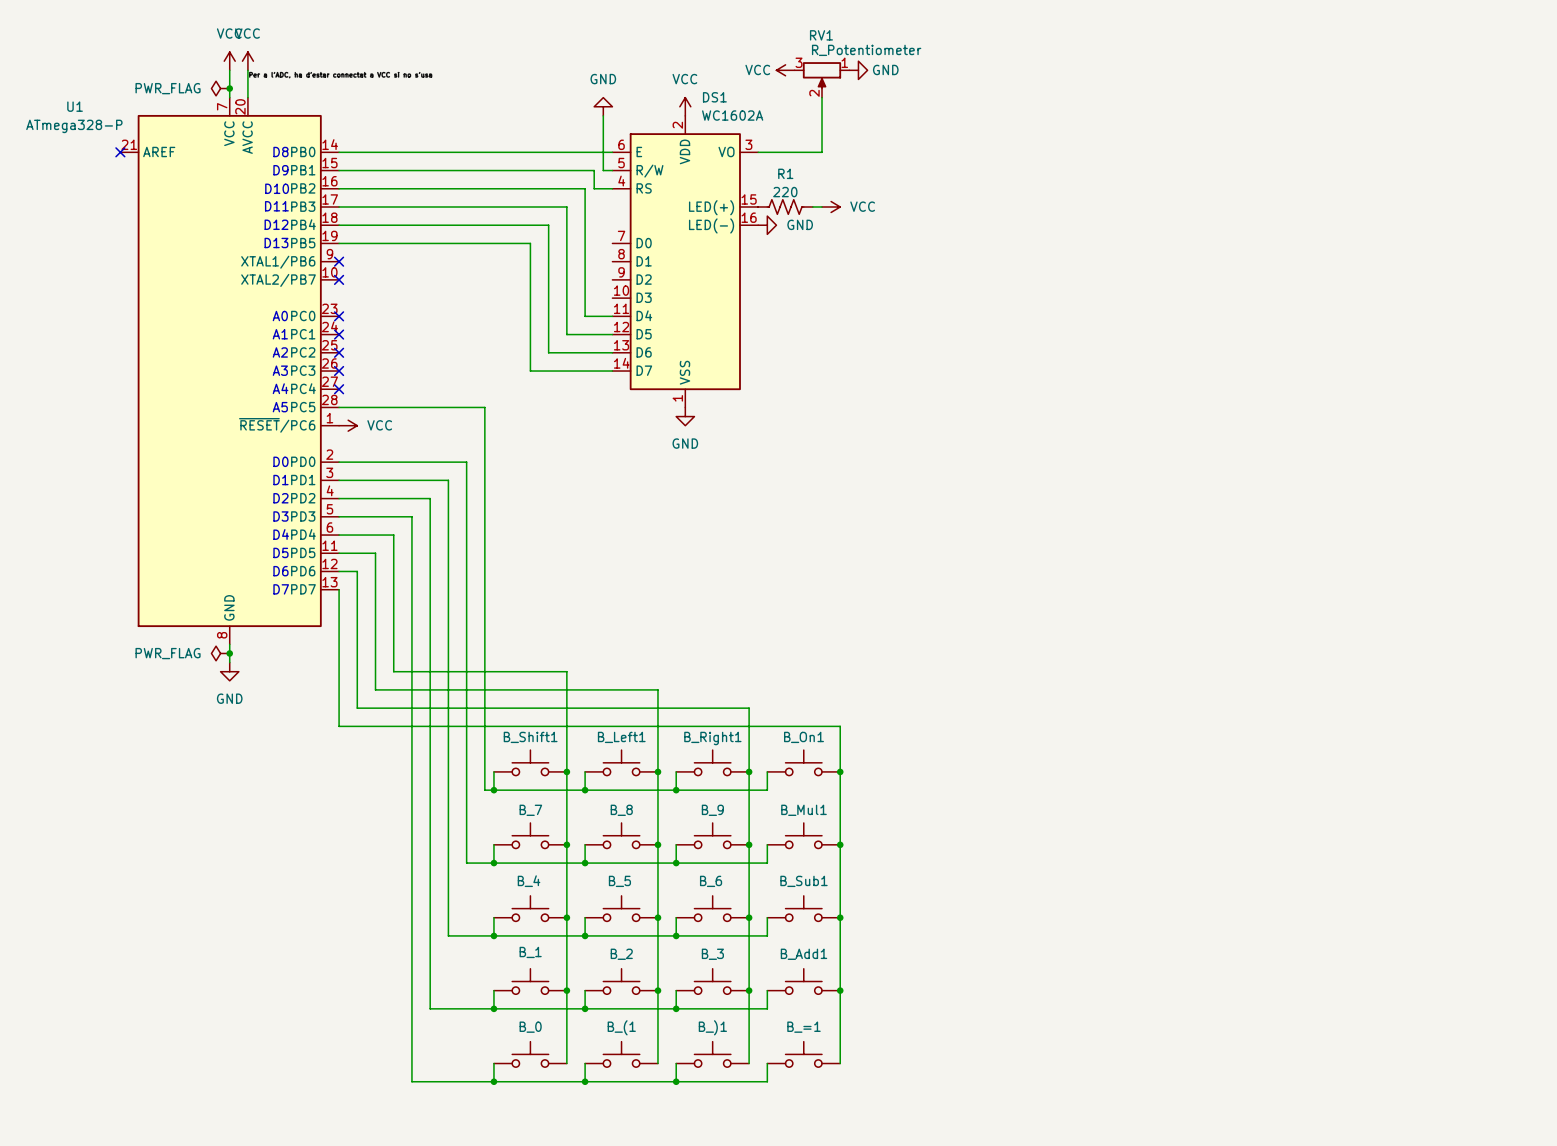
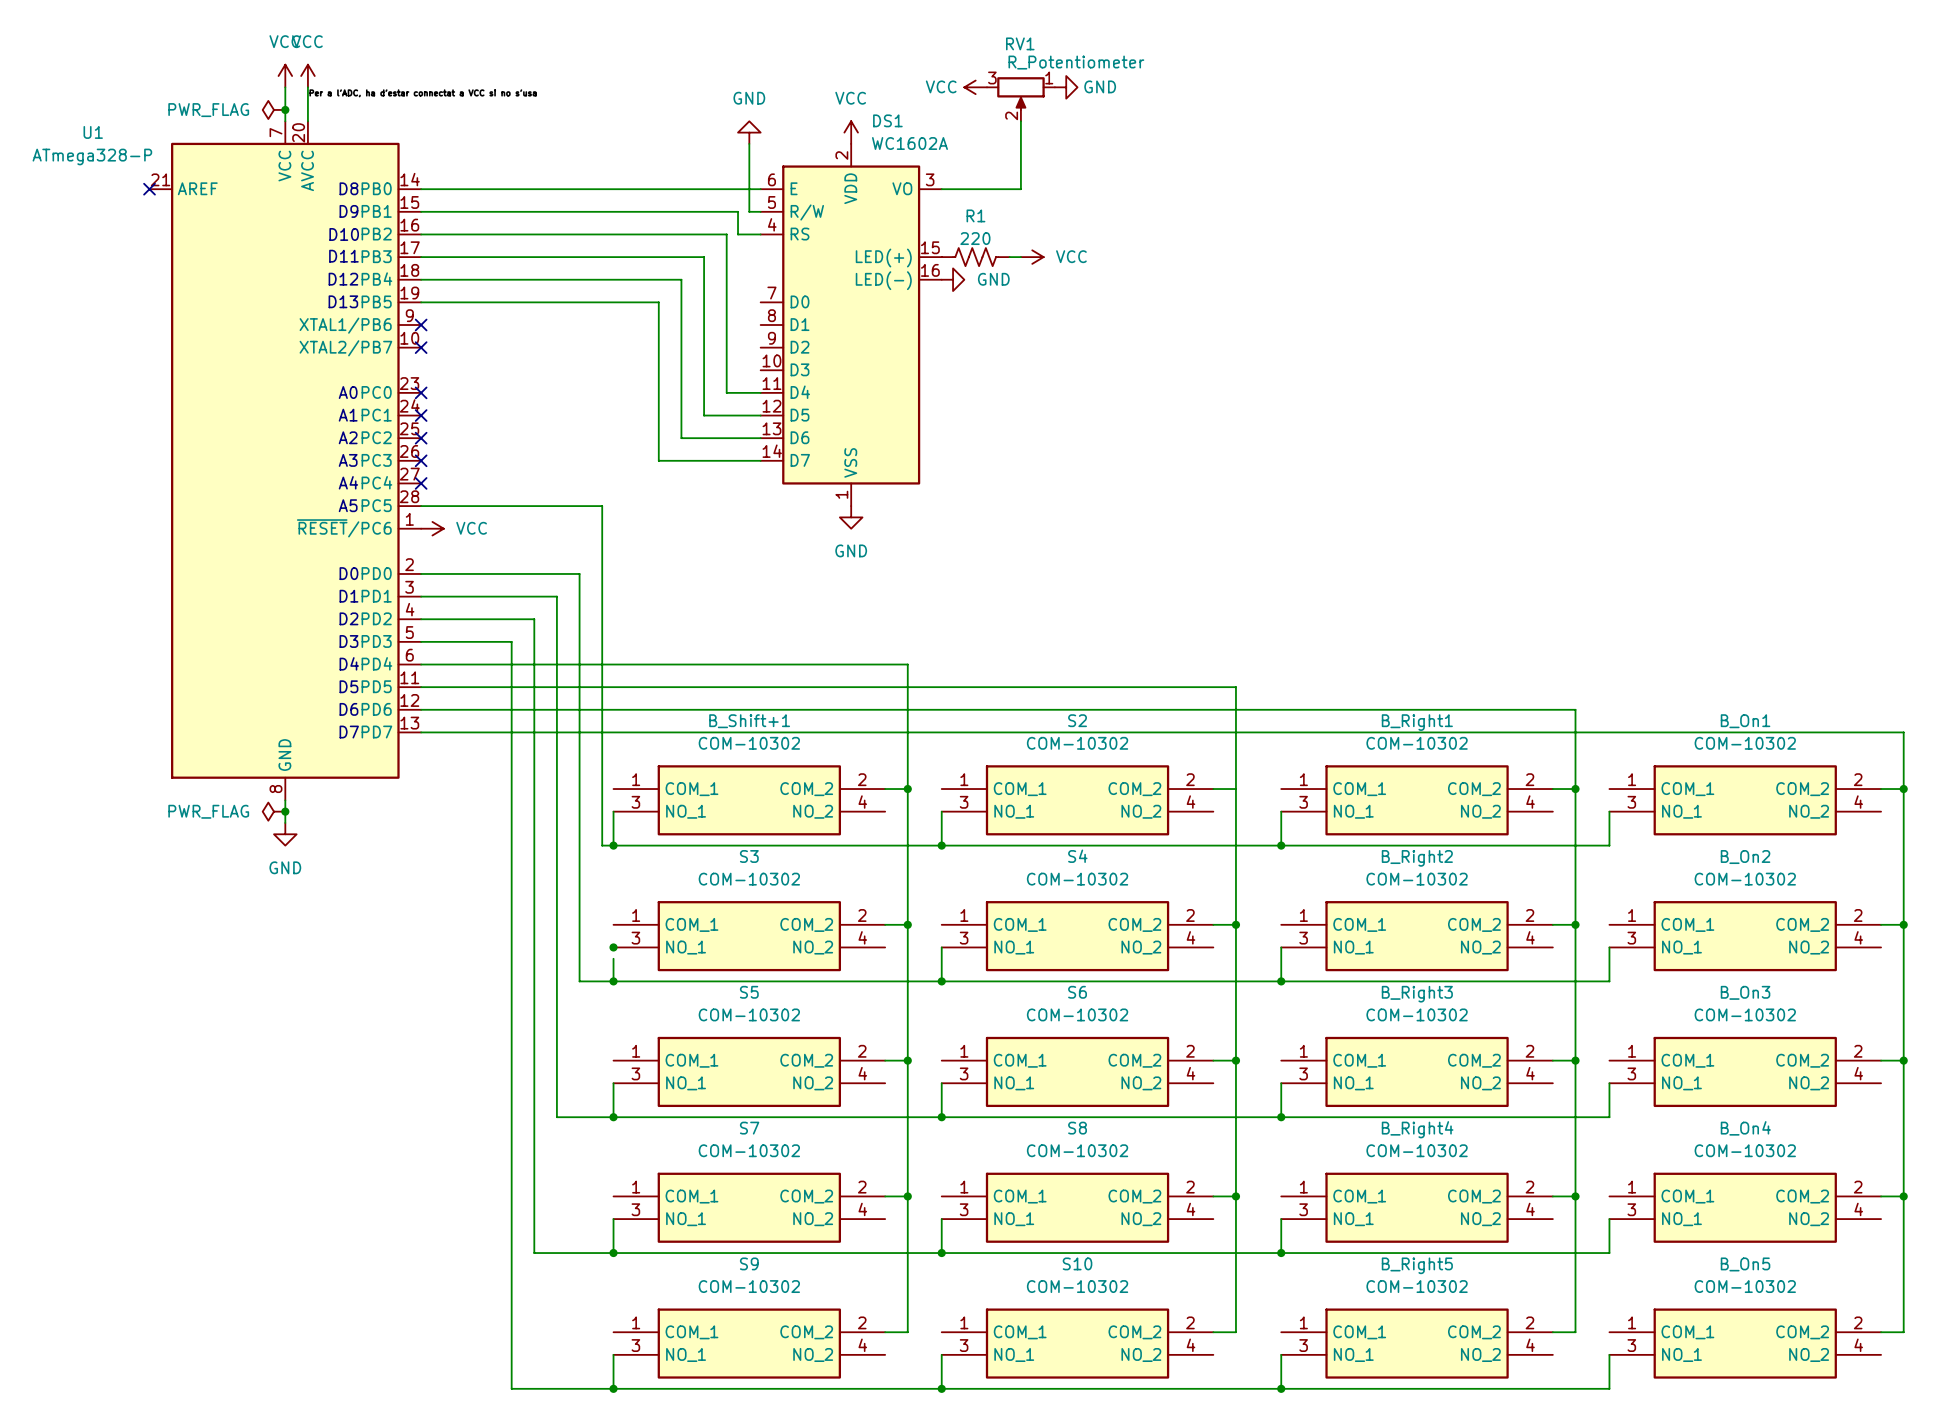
wire: (393, 535) (393, 671) (566, 671) (566, 1063) -> (489, 664) (907, 664) (907, 1332) (885, 1332)
wire: (375, 553) (375, 689) (657, 689) (657, 1063) -> (466, 687) (1235, 687) (1235, 1332) (1213, 1332)
wire: (357, 571) (357, 708) (749, 708) (749, 1063) -> (443, 709) (1575, 709) (1575, 1332) (1552, 1332)
wire: (339, 589) (339, 726) (840, 726) (840, 1063) -> (421, 732) (1903, 732) (1903, 1332) (1881, 1332)
B_Right1 value: none -> COM-10302 (1417, 743)
B_On1 value: none -> COM-10302 (1745, 743)
wire: none -> (885, 789) (907, 789)
junction: none -> (907, 789)
wire: none -> (1213, 789) (1235, 789)
wire: none -> (1552, 789) (1575, 789)
junction: none -> (1575, 789)
wire: none -> (1881, 789) (1903, 789)
junction: none -> (1903, 789)
B_Shift+1: none -> COM-10302 (749, 800)
S2: none -> COM-10302 (1077, 800)
wire: none -> (613, 811) (613, 845)
wire: none -> (941, 811) (941, 845)
wire: none -> (1281, 811) (1281, 845)
wire: none -> (1609, 811) (1609, 845) (602, 845)
wire: (484, 680) (484, 790) -> (579, 981) (602, 981)
junction: none -> (613, 845)
junction: none -> (941, 845)
junction: none -> (1281, 845)
B_On1 name position: B_On1 (803, 737) -> B_On1 (1745, 721)
B_Right1 name position: B_Right1 (712, 738) -> B_Right1 (1417, 722)
wire: none -> (885, 924) (907, 924)
junction: none -> (907, 924)
wire: none -> (1213, 924) (1235, 924)
junction: none -> (1235, 924)
wire: none -> (1552, 924) (1575, 924)
junction: none -> (1575, 924)
wire: none -> (1881, 924) (1903, 924)
junction: none -> (1903, 924)
B_Right1 symbol: [676, 750, 750, 776] -> [1281, 765, 1553, 836]
B_On1 symbol: [767, 750, 841, 776] -> [1609, 765, 1882, 836]
S3: none -> COM-10302 (749, 936)
S4: none -> COM-10302 (1077, 936)
B_Right2: none -> COM-10302 (1417, 936)
B_On2: none -> COM-10302 (1745, 936)
junction: none -> (613, 947)
B_Shift1: (530, 762) -> none
B_Left1: (621, 762) -> none
wire: none -> (941, 947) (941, 981)
wire: none -> (1281, 947) (1281, 981)
junction: (566, 771) -> none
junction: (657, 771) -> none
junction: (749, 771) -> none
wire: (767, 771) (767, 790) -> (1609, 947) (1609, 981) (953, 981)
junction: (840, 771) -> none
wire: (466, 790) (466, 863) (767, 863) (767, 844) -> none
junction: (585, 790) -> none
junction: (676, 790) -> none
junction: none -> (941, 981)
junction: none -> (1281, 981)
B_7: (530, 835) -> none
B_8: (621, 835) -> none
B_9: (712, 835) -> none
B_Mul1: (803, 835) -> none
wire: (493, 844) (493, 863) -> none
junction: (566, 844) -> none
junction: (657, 844) -> none
junction position: (749, 844) -> (907, 1060)
junction: (840, 844) -> none
wire: none -> (885, 1060) (907, 1060)
wire: none -> (1213, 1060) (1235, 1060)
junction: none -> (1235, 1060)
wire: none -> (1552, 1060) (1575, 1060)
junction: none -> (1575, 1060)
wire: none -> (1881, 1060) (1903, 1060)
junction: none -> (1903, 1060)
junction: (493, 863) -> none
junction: (585, 863) -> none
S5: none -> COM-10302 (749, 1071)
junction: (676, 863) -> none
S6: none -> COM-10302 (1077, 1071)
B_Right3: none -> COM-10302 (1417, 1071)
B_On3: none -> COM-10302 (1745, 1071)
wire: none -> (613, 1083) (613, 1117)
wire: none -> (941, 1083) (941, 1117)
wire: none -> (1281, 1083) (1281, 1117)
wire: (448, 899) (448, 935) (767, 935) (767, 917) -> (556, 1117) (1609, 1117) (1609, 1083)
junction: none -> (613, 1117)
junction: none -> (1281, 1117)
B_4: (530, 908) -> none
B_5: (621, 908) -> none
B_6: (712, 908) -> none
B_Sub1: (803, 908) -> none
wire: (493, 917) (493, 935) -> none
junction: (566, 917) -> none
wire: (585, 917) (585, 935) -> none
junction: (657, 917) -> none
wire: (676, 917) (676, 935) -> none
junction position: (749, 917) -> (941, 1117)
junction: (840, 917) -> none
junction: (493, 935) -> none
junction: (585, 935) -> none
junction: (676, 935) -> none
wire: none -> (885, 1196) (907, 1196)
junction: none -> (907, 1196)
wire: none -> (1213, 1196) (1235, 1196)
junction: none -> (1235, 1196)
wire: none -> (1552, 1196) (1575, 1196)
junction: none -> (1575, 1196)
wire: none -> (1881, 1196) (1903, 1196)
junction: none -> (1903, 1196)
S7: none -> COM-10302 (749, 1207)
S8: none -> COM-10302 (1077, 1207)
B_Right4: none -> COM-10302 (1417, 1207)
B_On4: none -> COM-10302 (1745, 1207)
wire: none -> (613, 1219) (613, 1230)
B_1: (530, 981) -> none
B_2: (621, 981) -> none
B_3: (712, 981) -> none
wire: none -> (941, 1219) (941, 1253)
B_Add1: (803, 981) -> none
wire: none -> (1281, 1219) (1281, 1253)
junction: (566, 990) -> none
junction: (657, 990) -> none
junction: (749, 990) -> none
wire: (767, 990) (767, 1008) -> (1609, 1219) (1609, 1253) (953, 1253)
junction: (840, 990) -> none
junction: (585, 1008) -> none
junction: (676, 1008) -> none
junction: none -> (941, 1253)
junction: none -> (1281, 1253)
B_0: (530, 1054) -> none
B_(1: (621, 1054) -> none
B_)1: (712, 1054) -> none
B_=1: (803, 1054) -> none
wire: (493, 1063) (493, 1081) -> none
wire: (767, 1063) (767, 1081) (411, 1081) -> (1609, 1354) (1609, 1388) (511, 1388) (511, 1343)
junction position: (493, 1081) -> (613, 1388)
junction: (585, 1081) -> none
S9: none -> COM-10302 (749, 1343)
junction: (676, 1081) -> none
S10: none -> COM-10302 (1077, 1343)
B_Right5: none -> COM-10302 (1417, 1343)
B_On5: none -> COM-10302 (1745, 1343)
wire: none -> (613, 1354) (613, 1388)
wire: none -> (941, 1354) (941, 1388)
wire: none -> (1281, 1354) (1281, 1388)
junction: none -> (941, 1388)
junction: none -> (1281, 1388)

